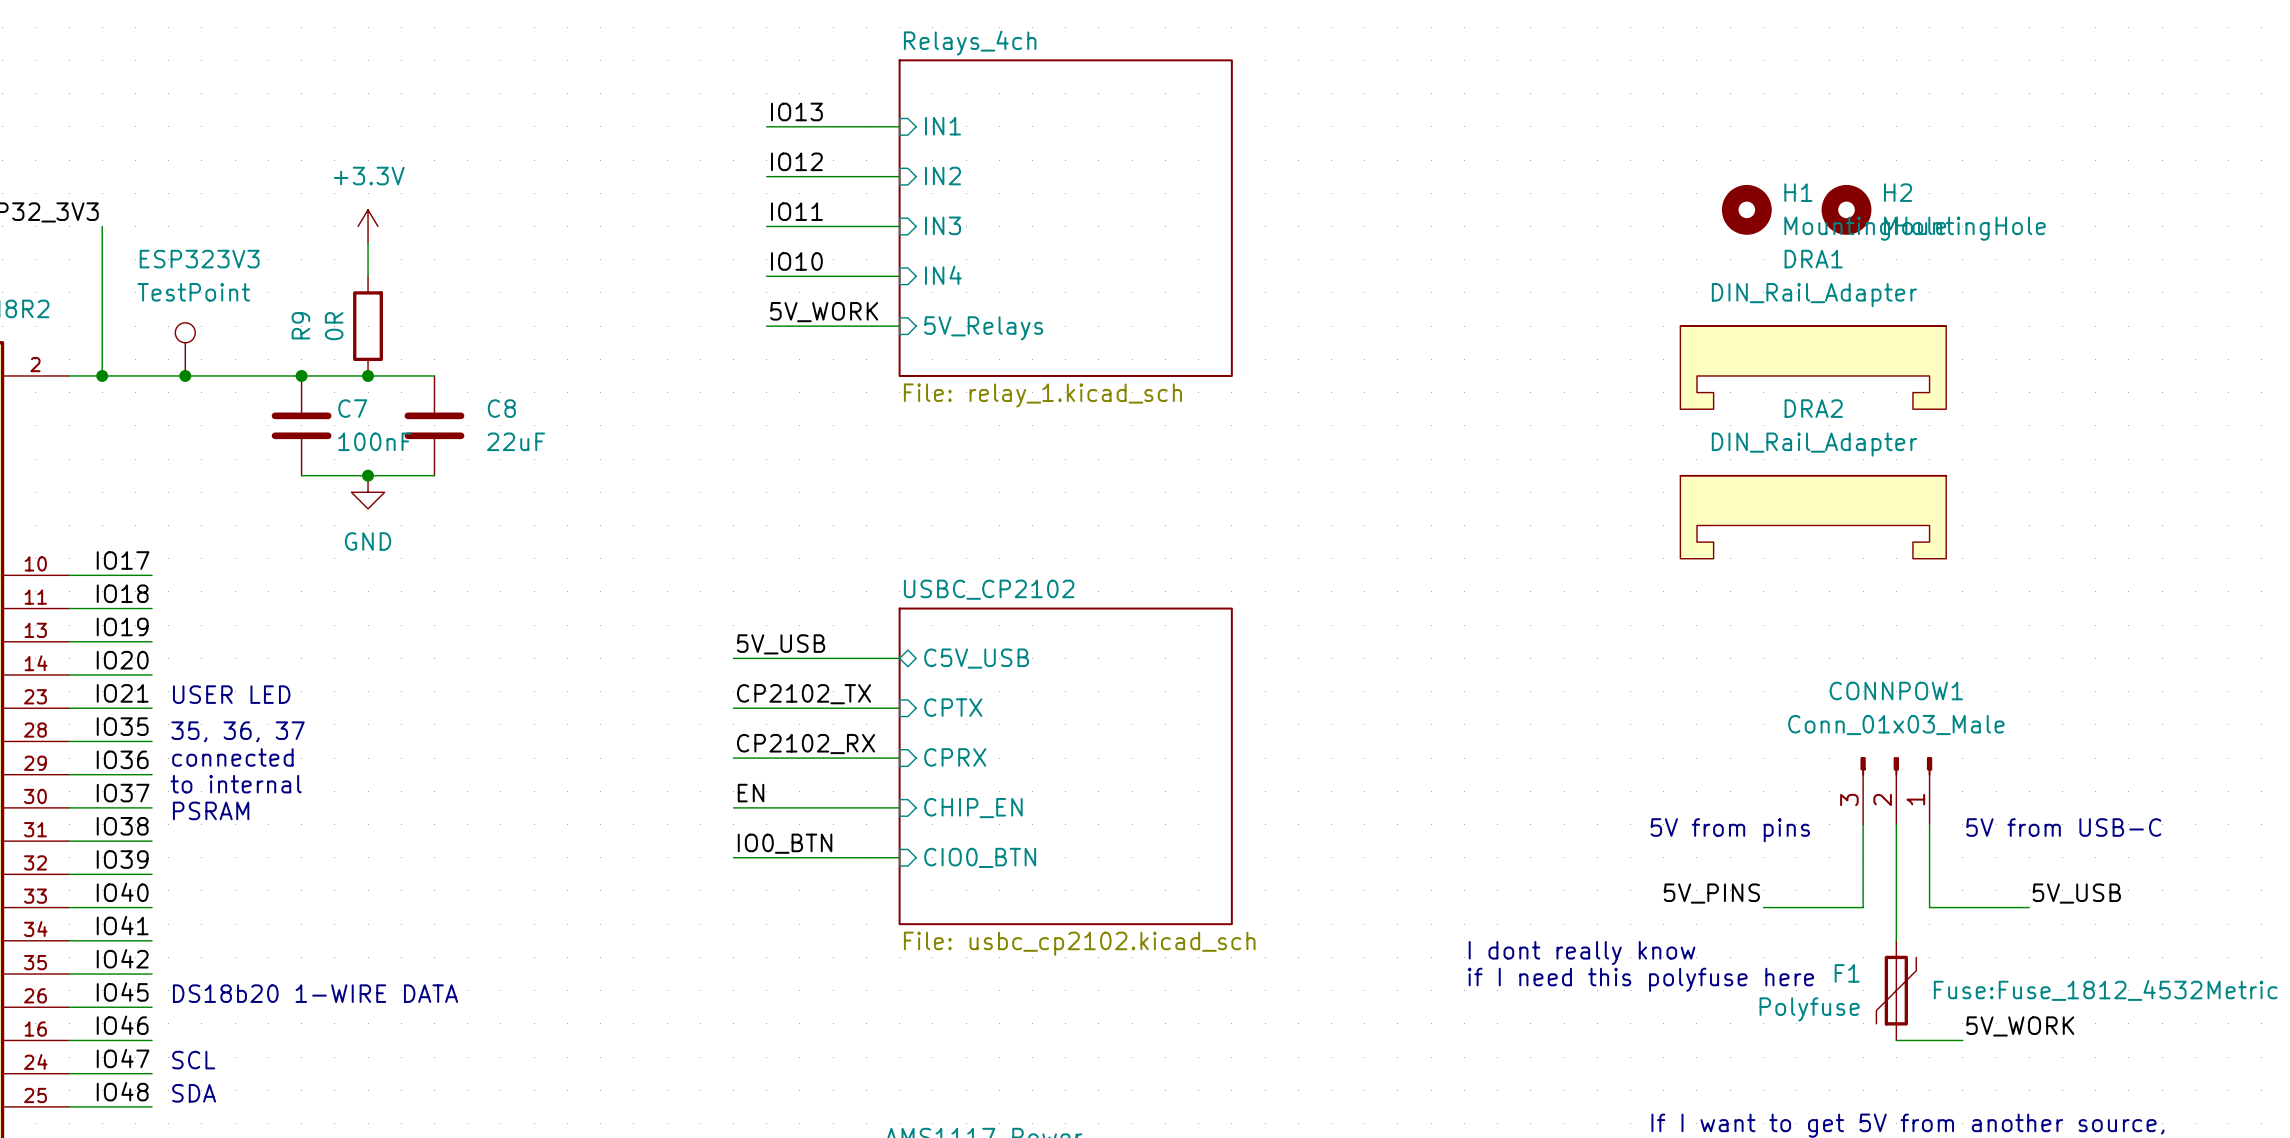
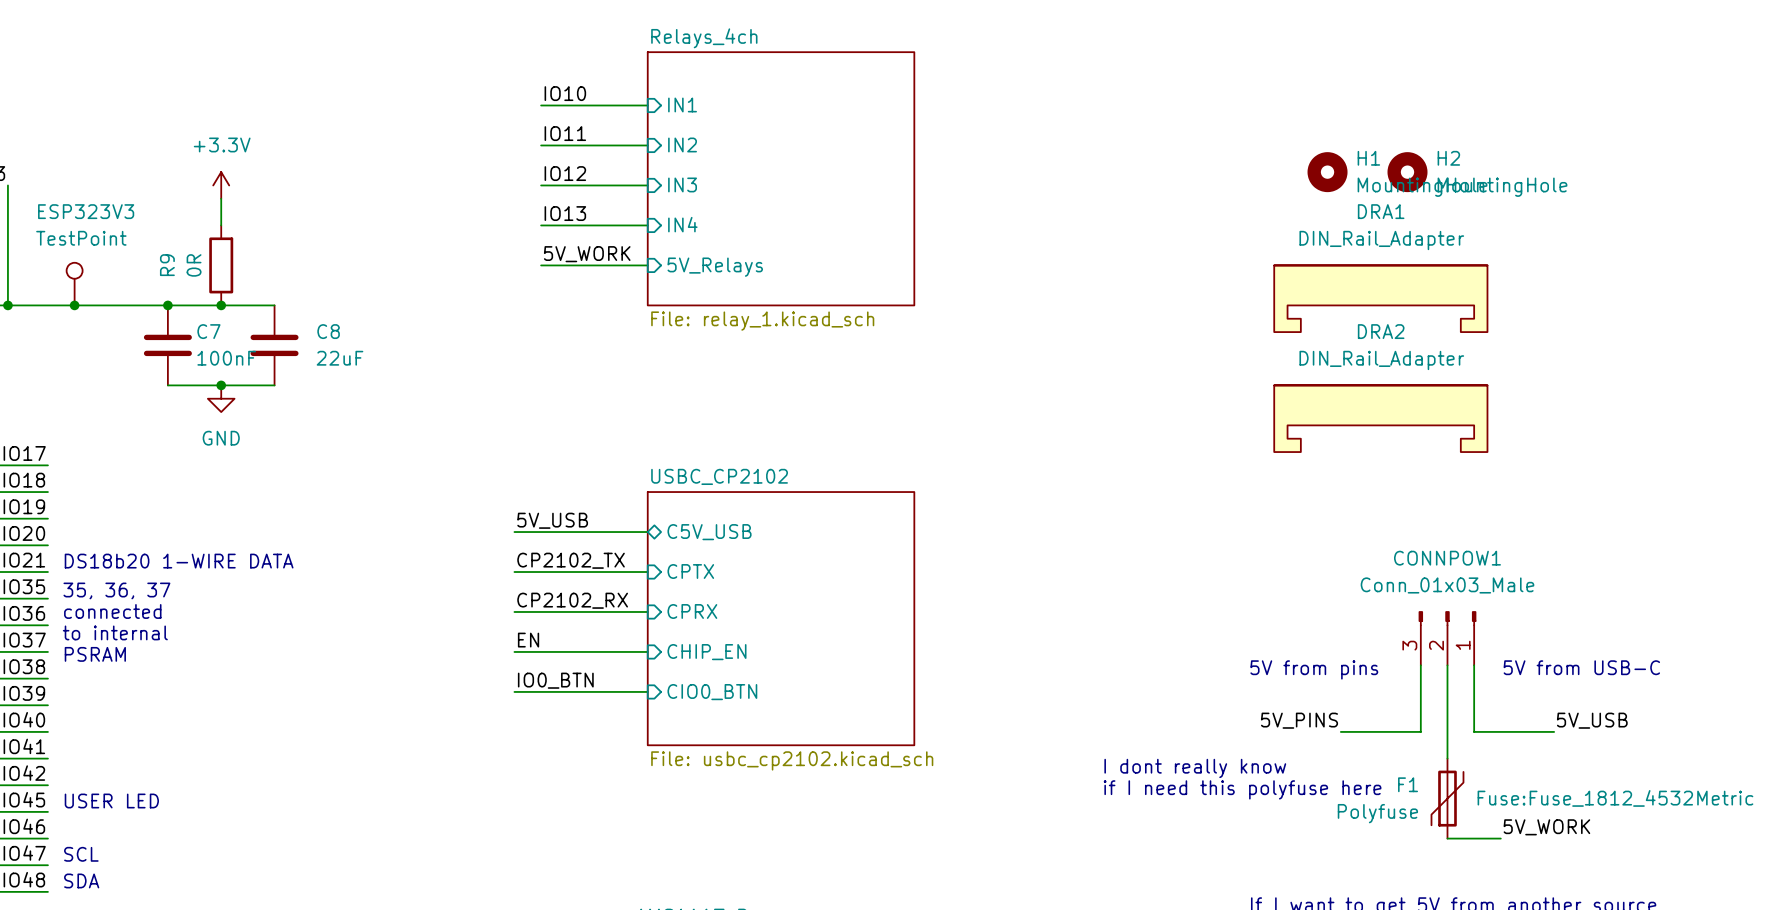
label: IO13 (796, 111) -> IO10 (565, 93)
label: IO12 (796, 161) -> IO11 (565, 133)
label: IO11 (796, 211) -> IO12 (565, 173)
label: IO10 (796, 261) -> IO13 (565, 213)
text: USER LED (231, 694) -> DS18b20 1-WIRE DATA (179, 561)
text: DS18b20 1-WIRE DATA (315, 993) -> USER LED (111, 801)

